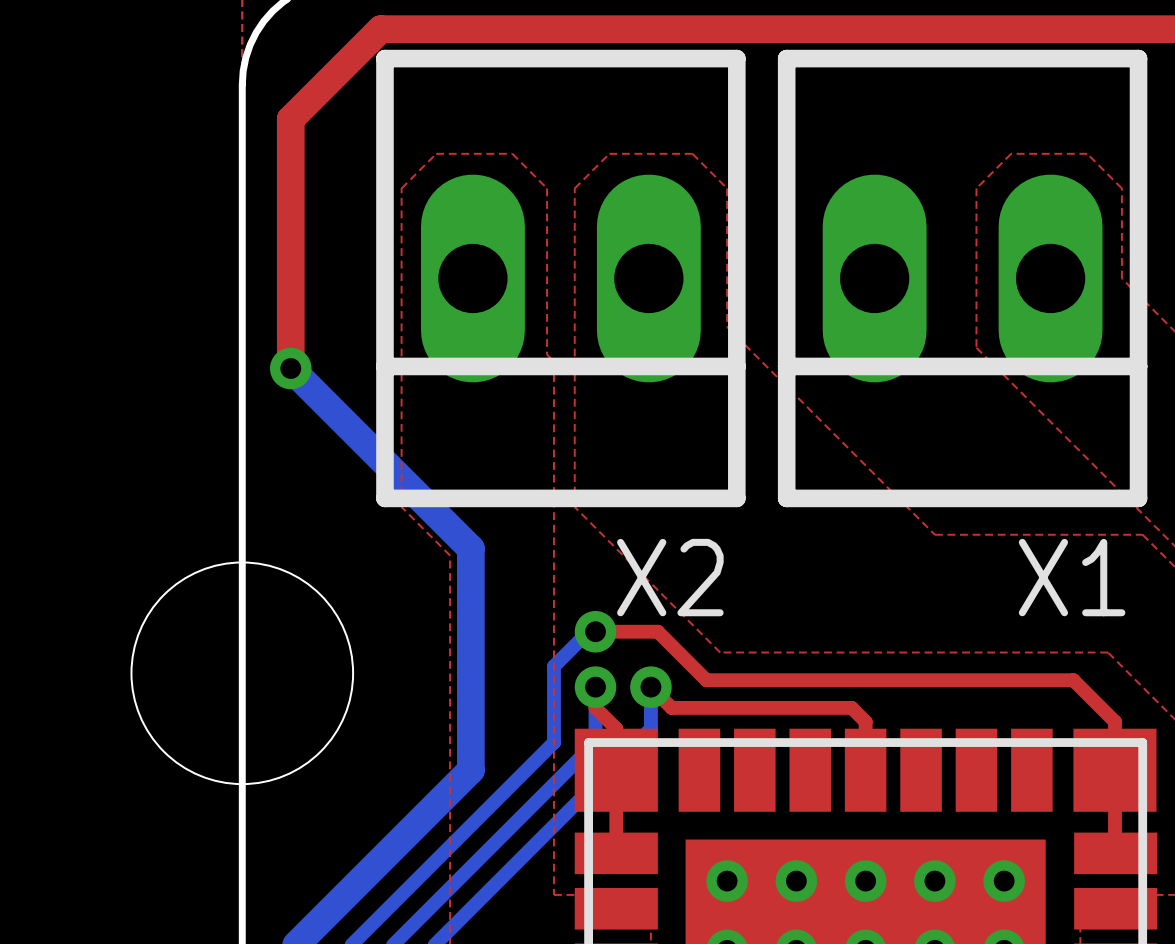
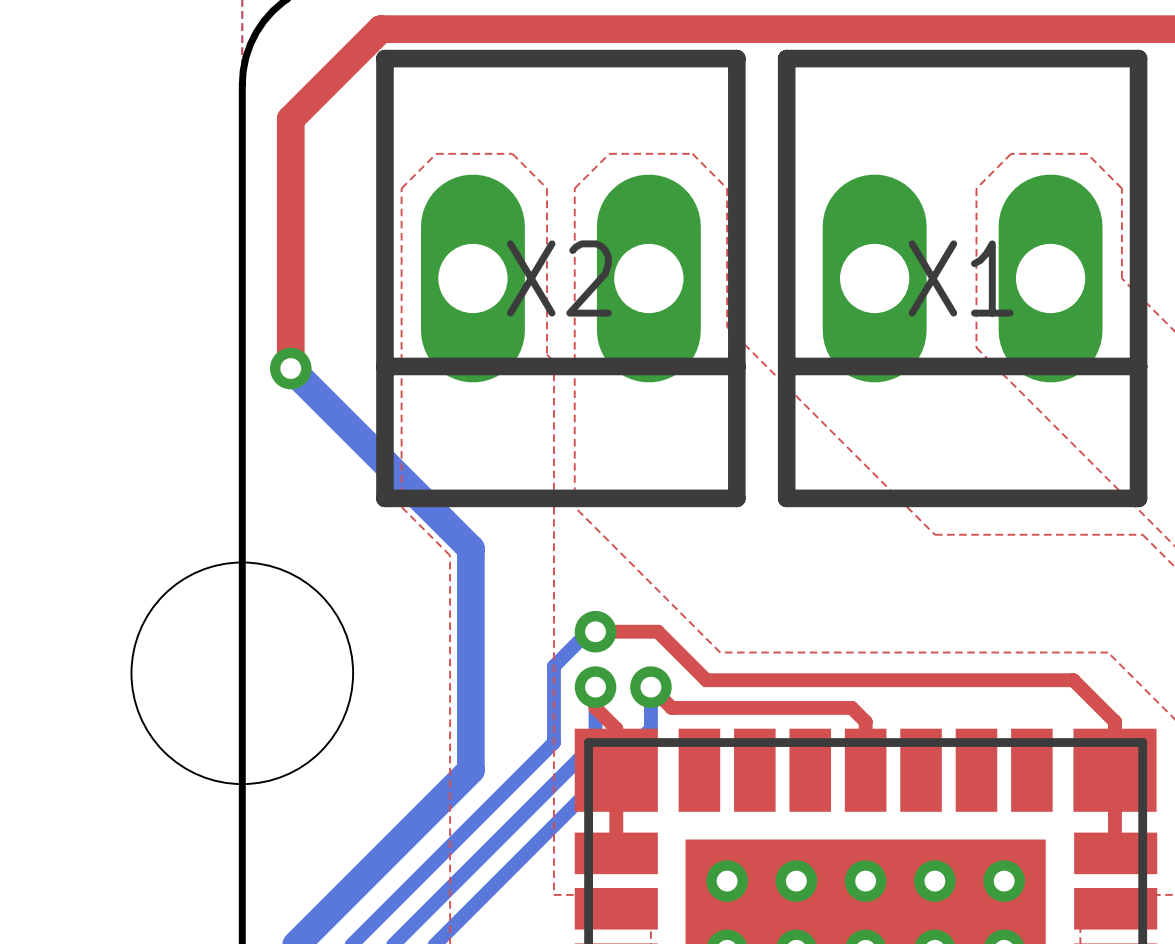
X2 name position: X2 (670, 577) -> X2 (559, 278)
X1 name position: X1 (1072, 577) -> X1 (961, 278)

